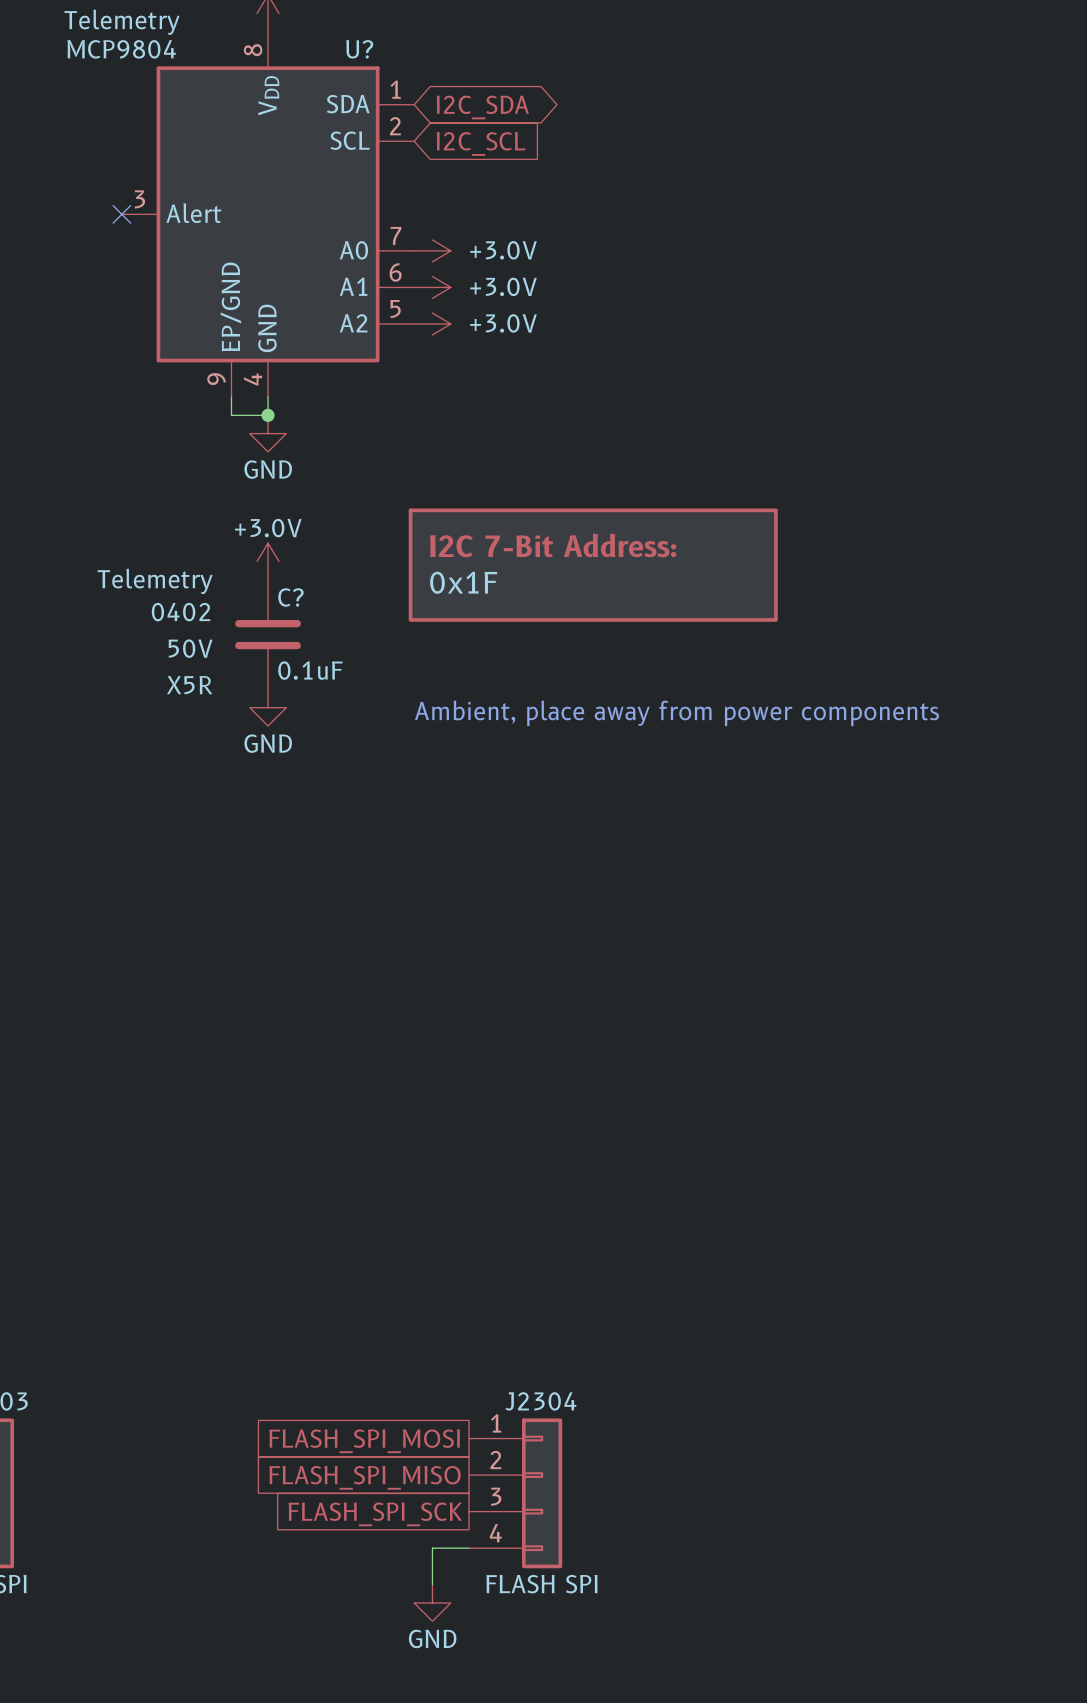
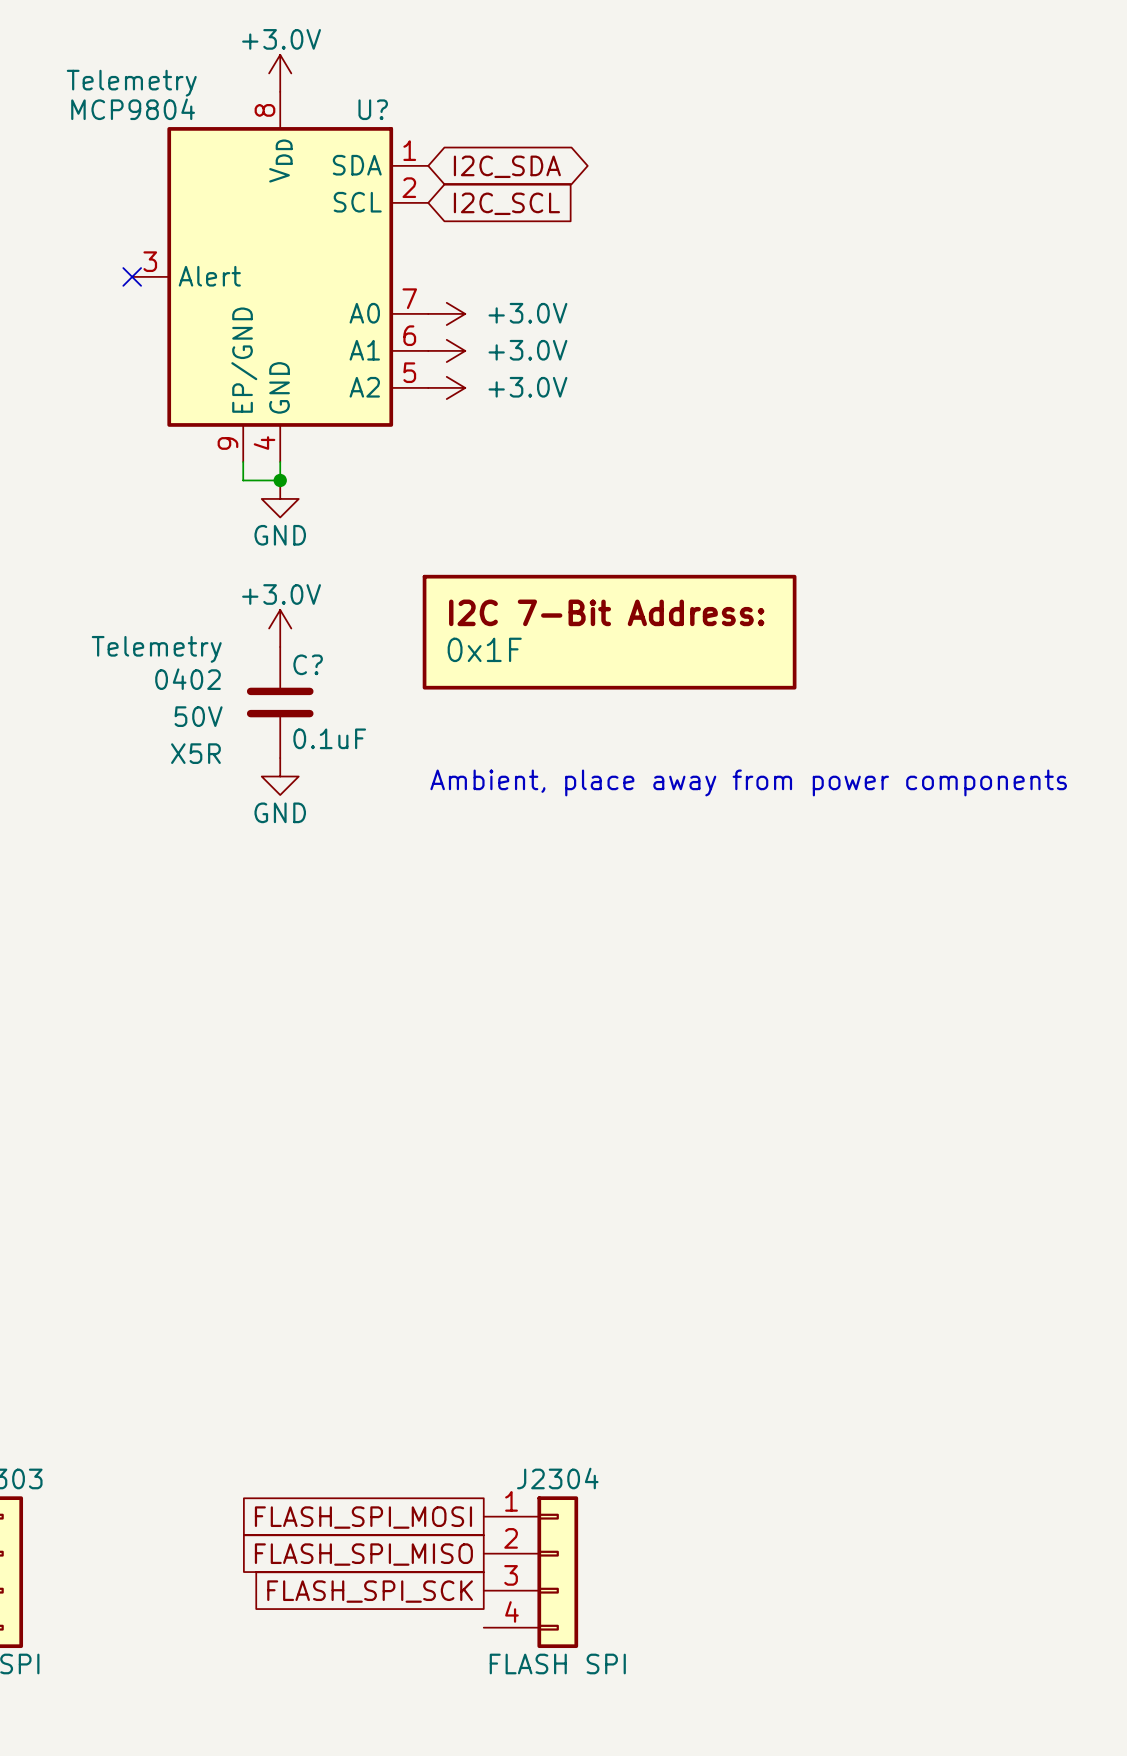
wire: (469, 1548) (432, 1548) (432, 1584) -> none
power symbol: GND (432, 1602) -> none

